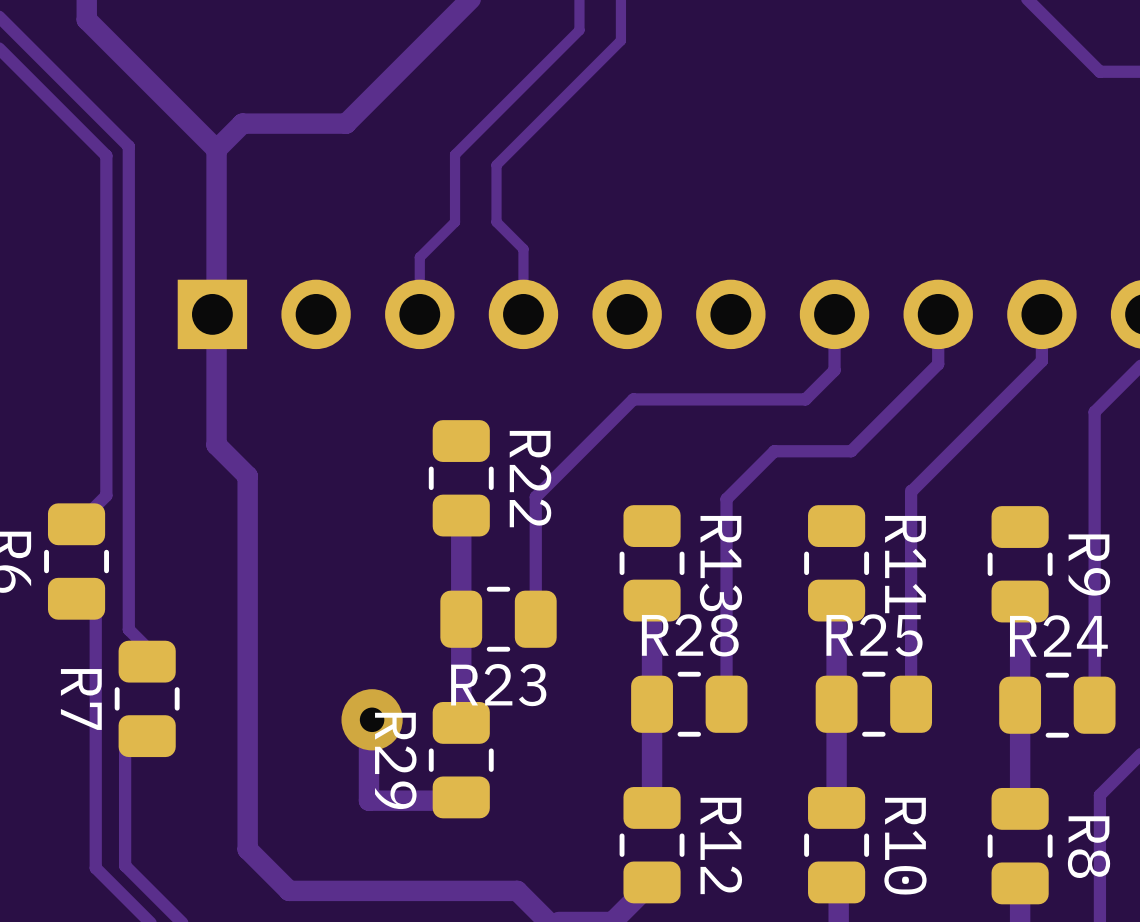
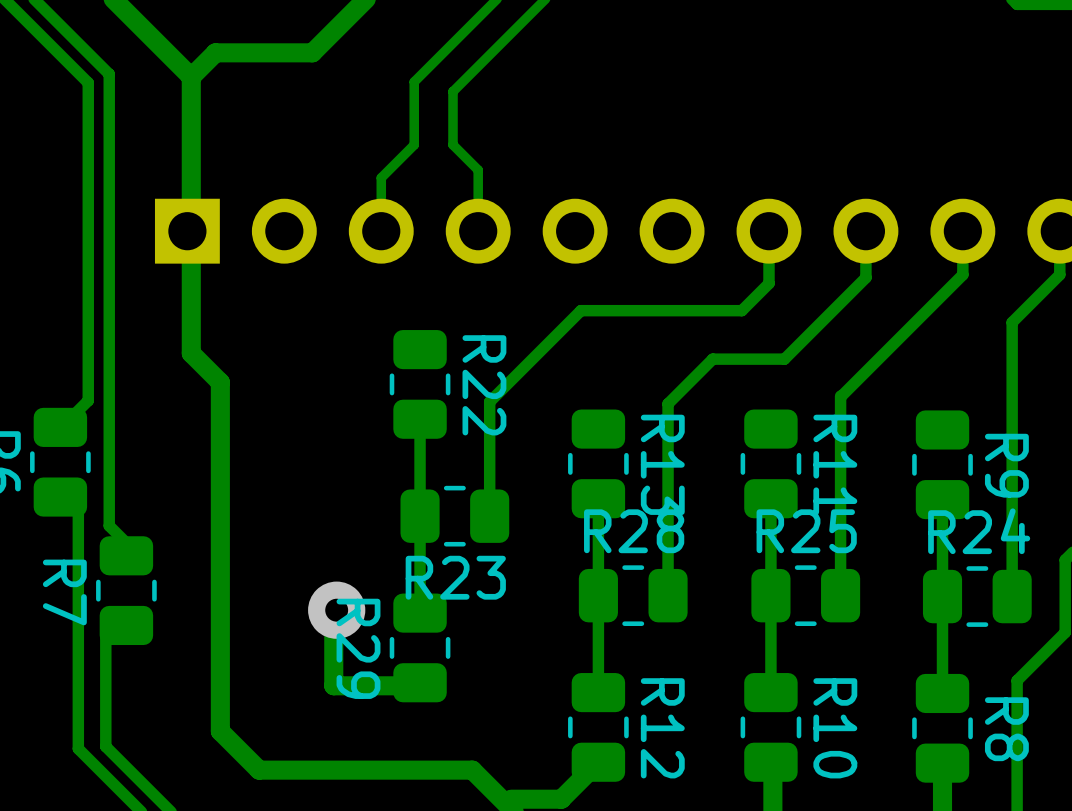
track width: thick (461, 515) (461, 722) -> thin (420, 419) (420, 613)
track width: thick (652, 600) (652, 807) -> thin (598, 498) (598, 692)
track width: thick (836, 600) (836, 807) -> thin (770, 498) (770, 692)
track width: thick (1020, 601) (1020, 808) -> thin (942, 499) (942, 693)

